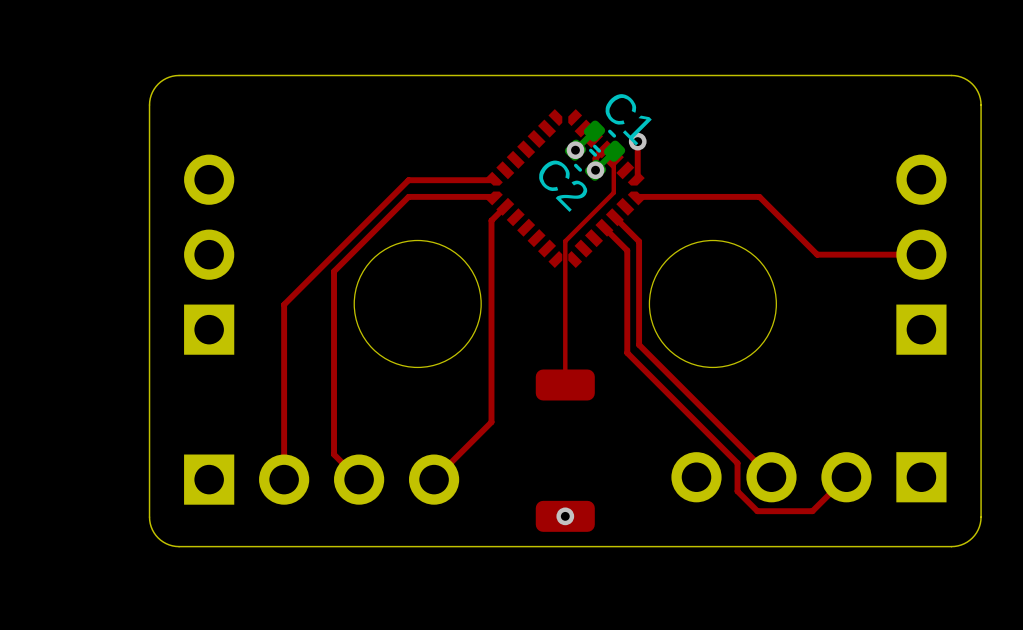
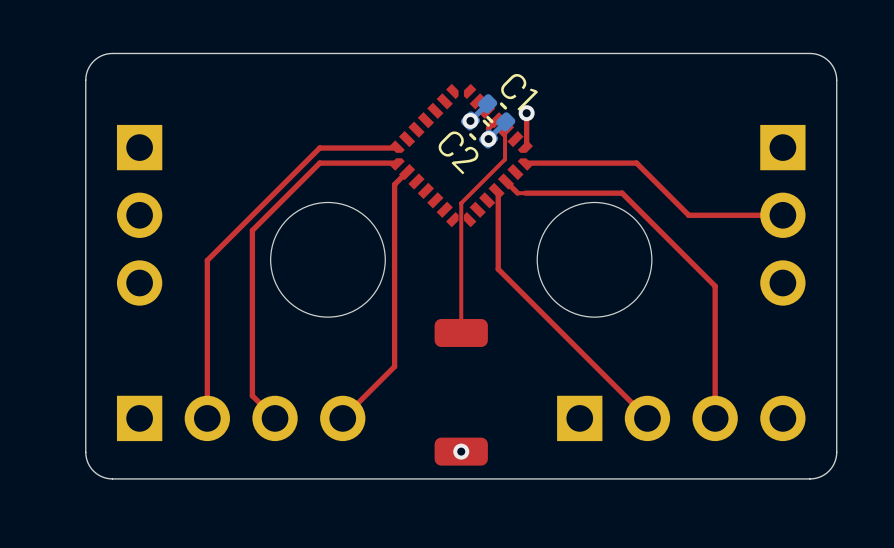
top track: (606, 229) (627, 250) (627, 352) (737, 463) (737, 491) (757, 511) (812, 511) (846, 477) -> (498, 192) (498, 269) (647, 418)
top track: (627, 230) (639, 241) (639, 344) (771, 477) -> (517, 193) (622, 193) (715, 286) (715, 418)
part rotation: 0° (209, 254) -> 180° (139, 215)
part rotation: 0° (921, 254) -> 180° (782, 215)
part rotation: 0° (808, 477) -> 180° (681, 418)

